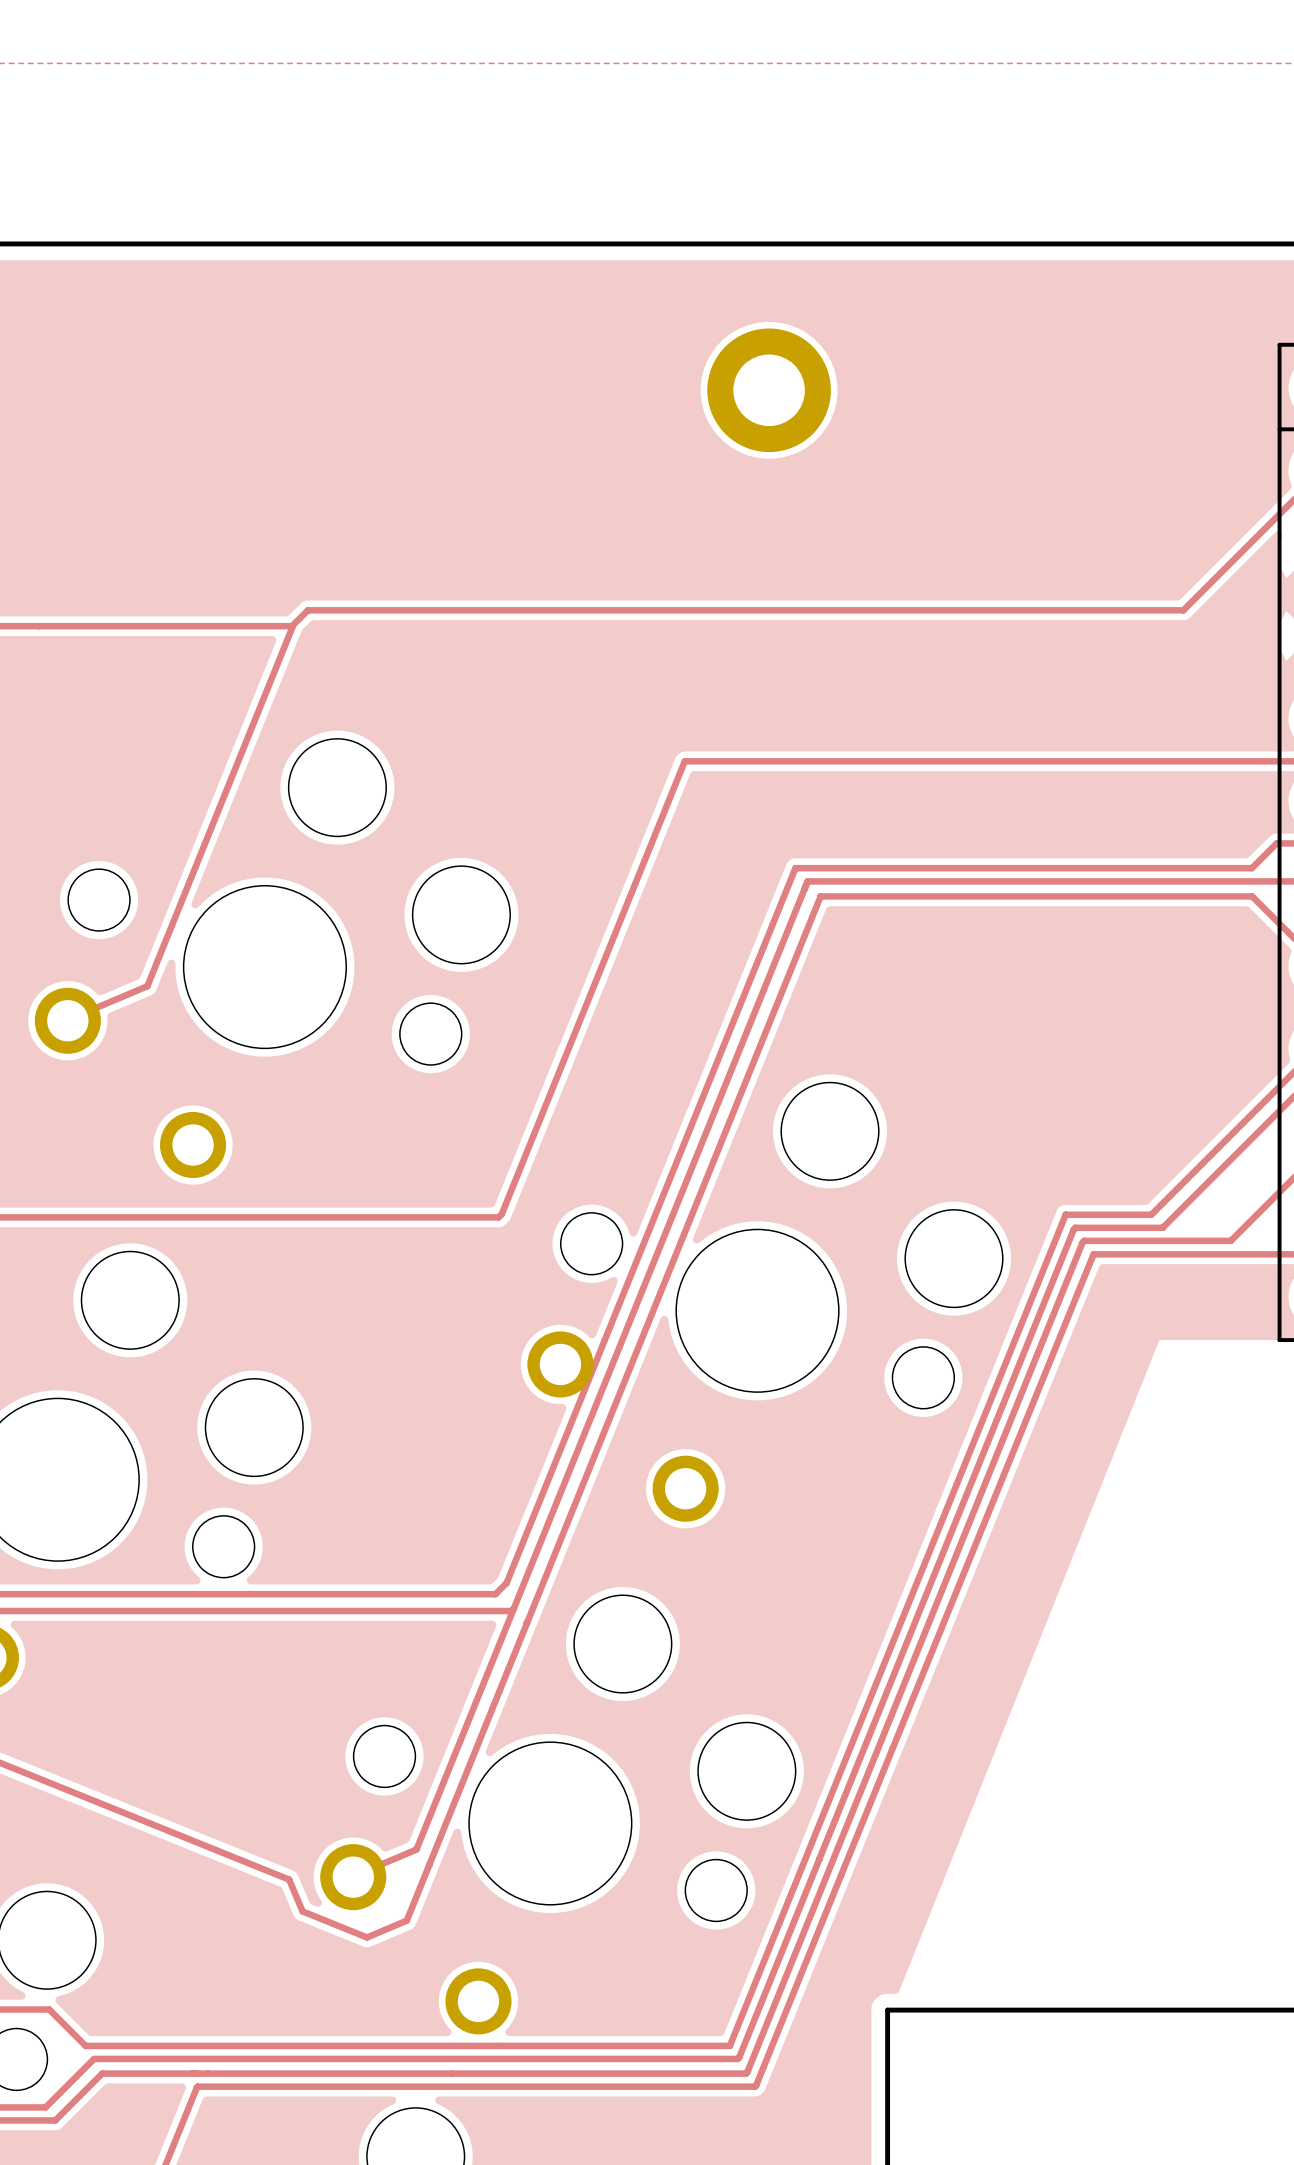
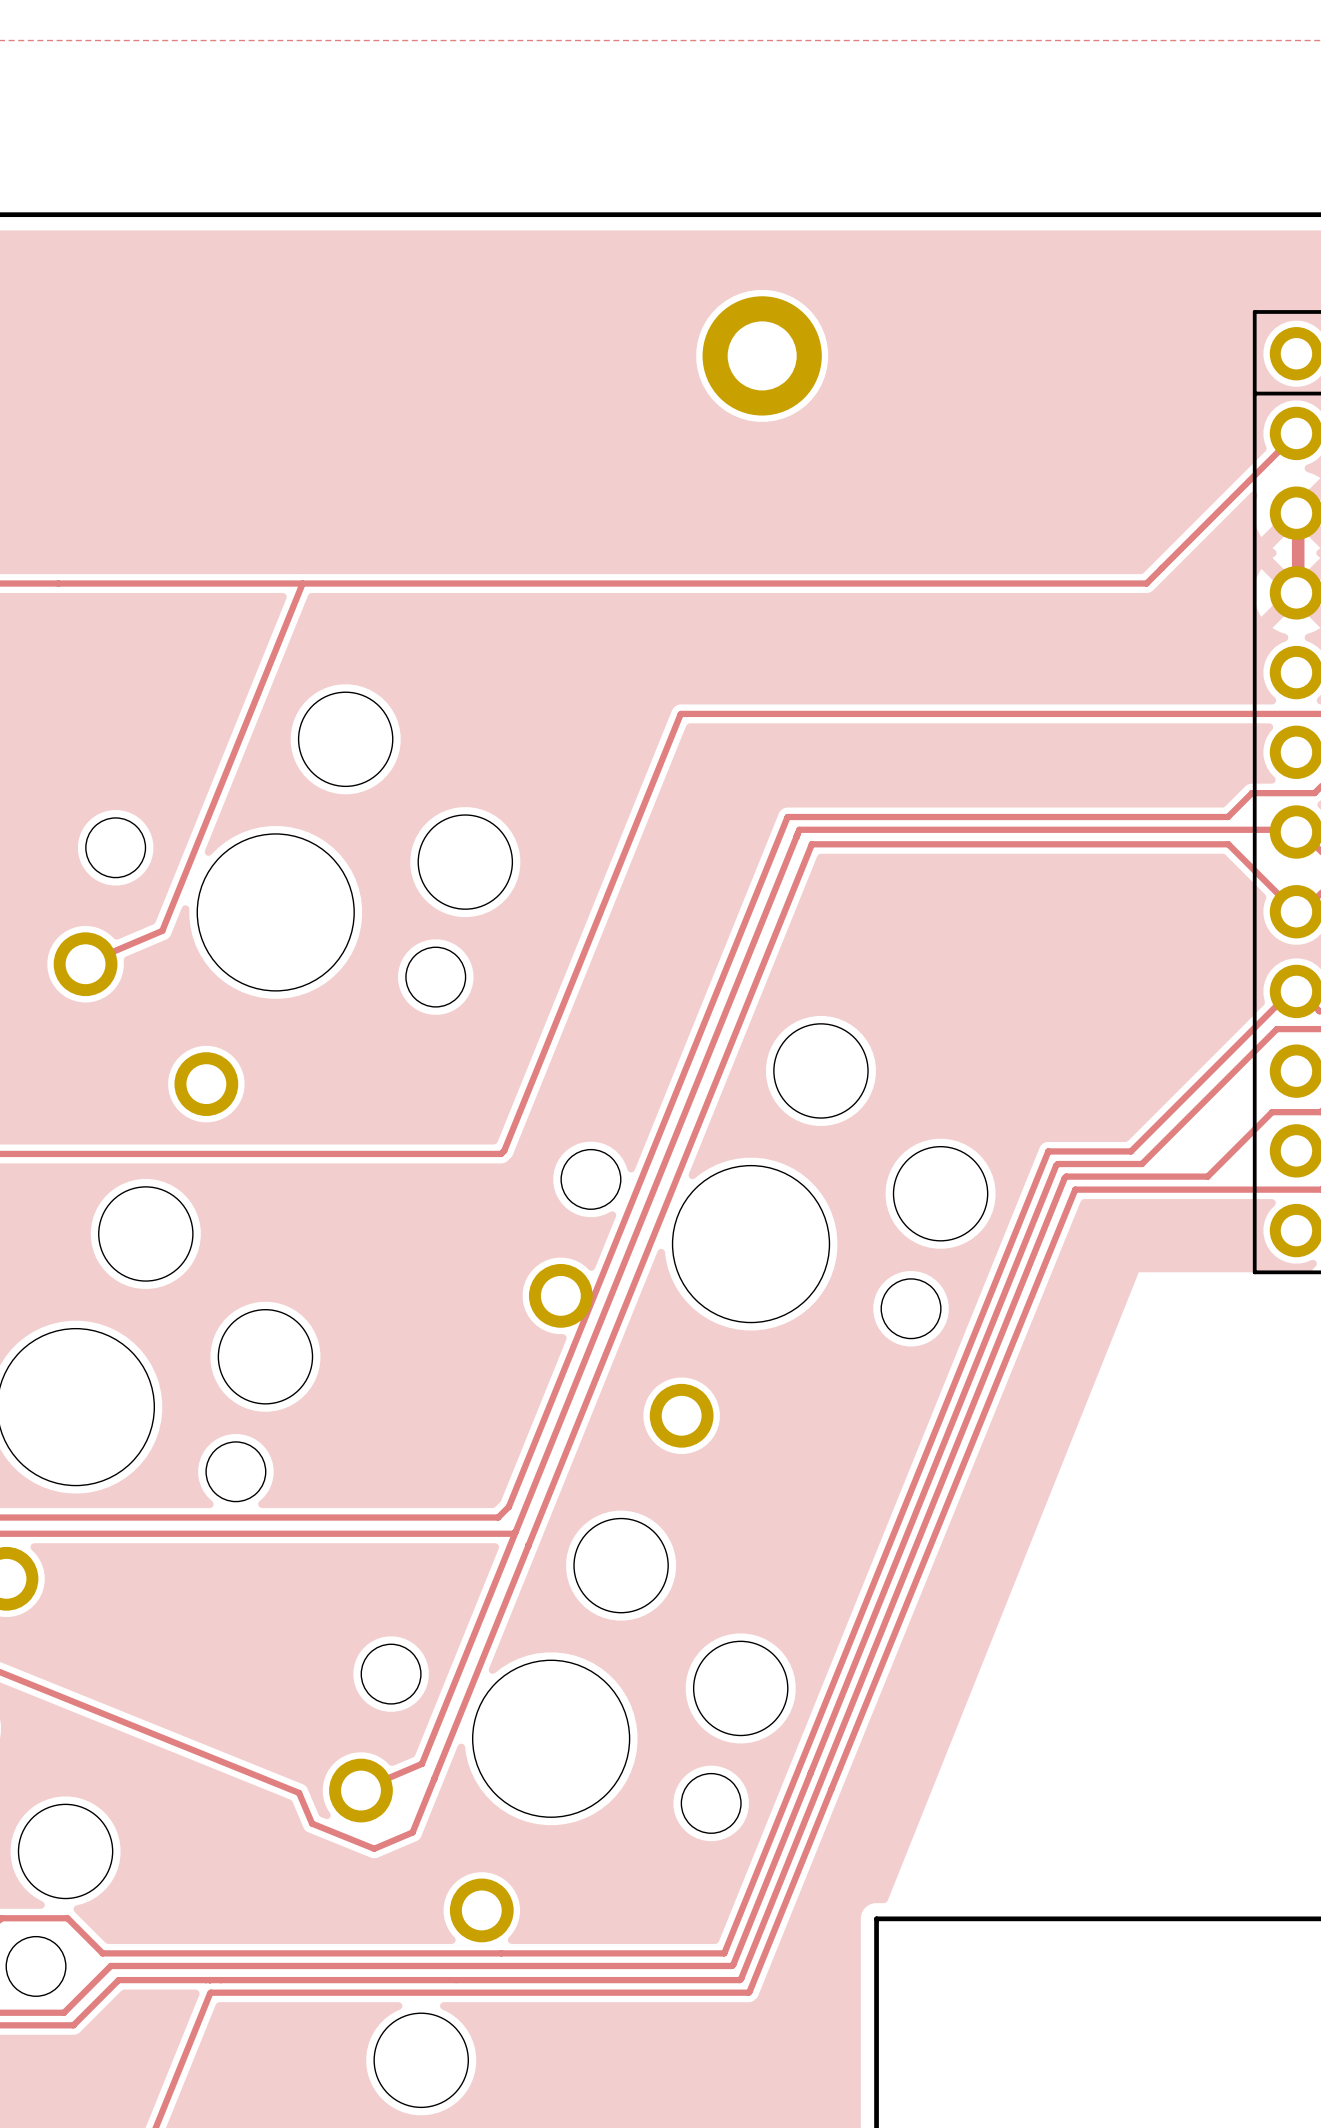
track: (1183, 610) (307, 610) (292, 626) -> (1161, 568) (1146, 583) (301, 583)

